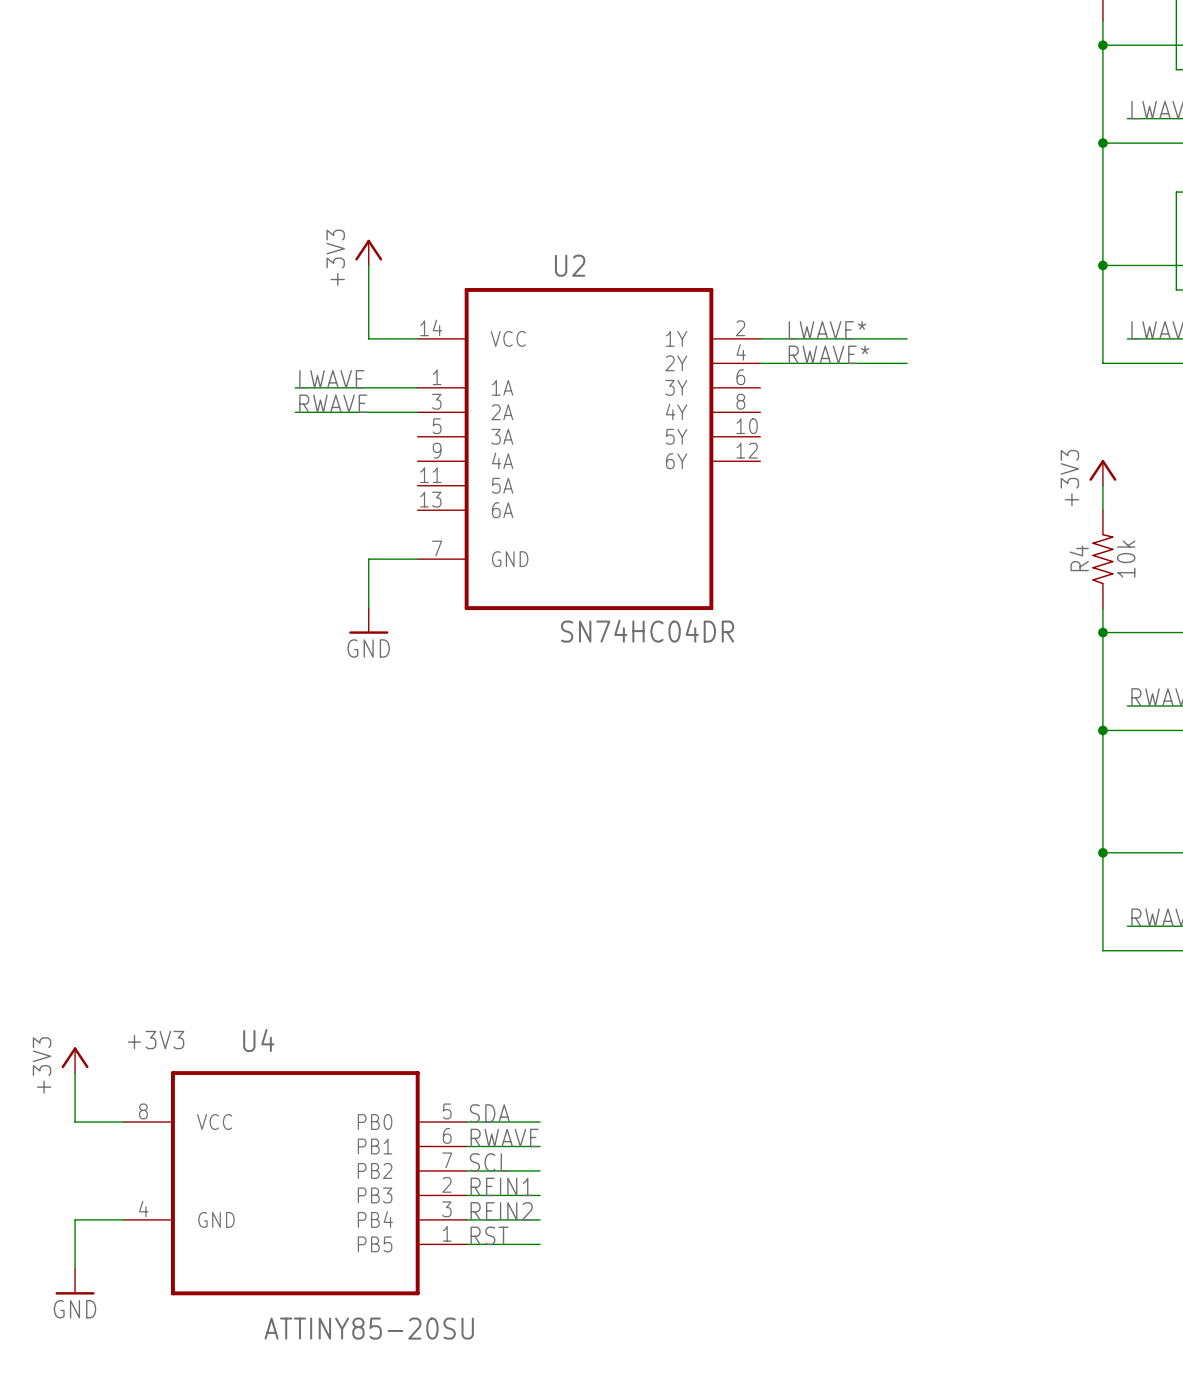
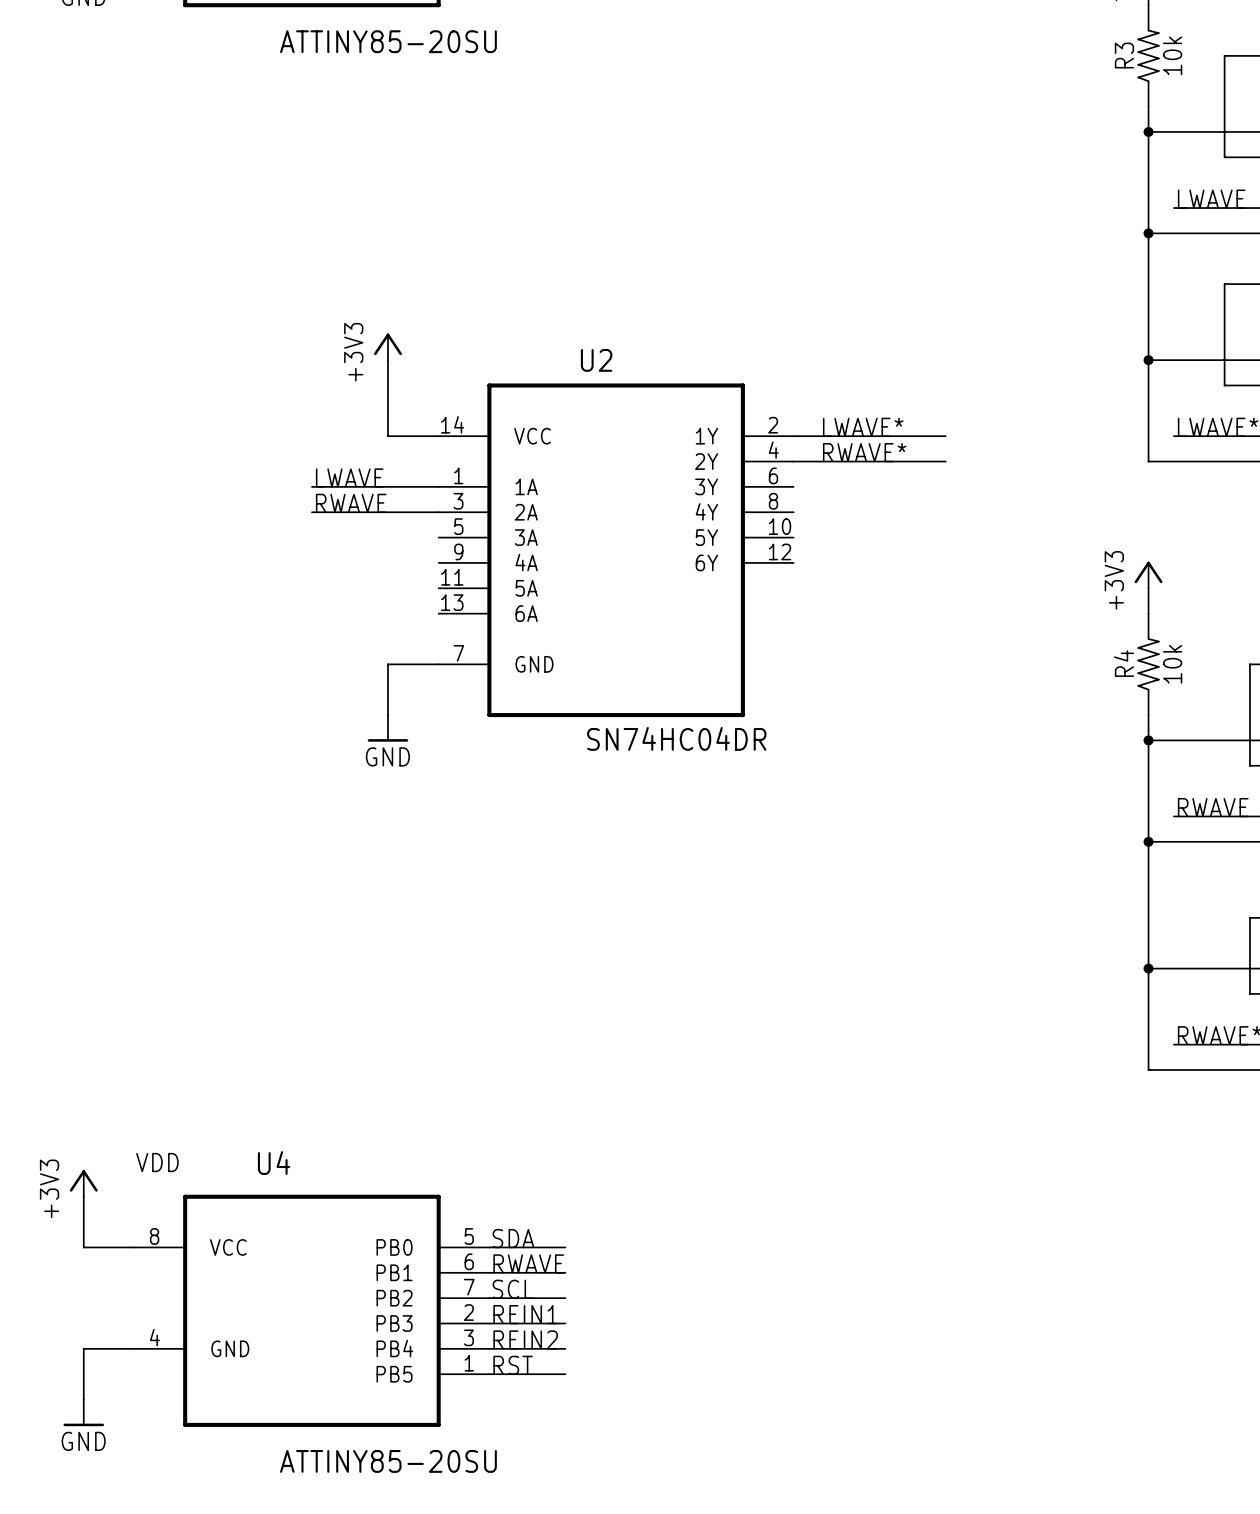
label: +3V3 (156, 1040) -> VDD (157, 1162)

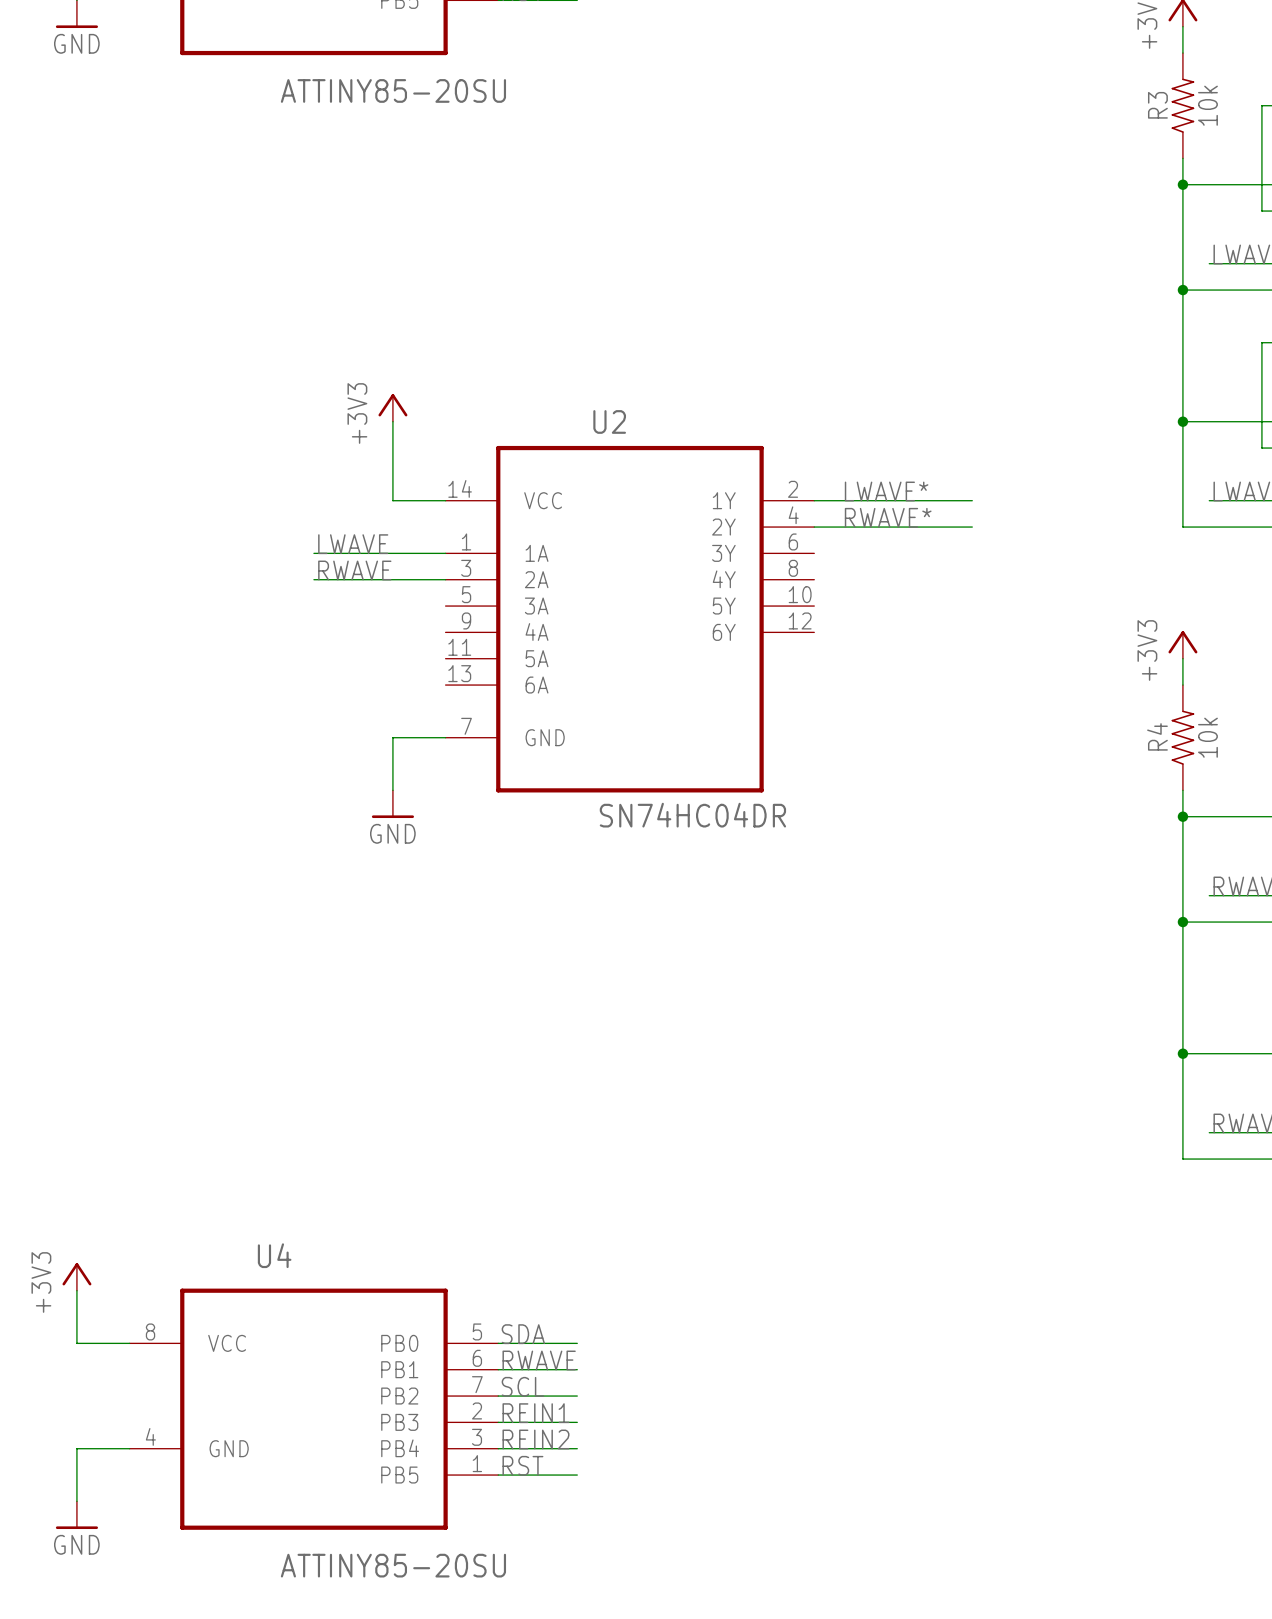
label: VDD (157, 1162) -> none

